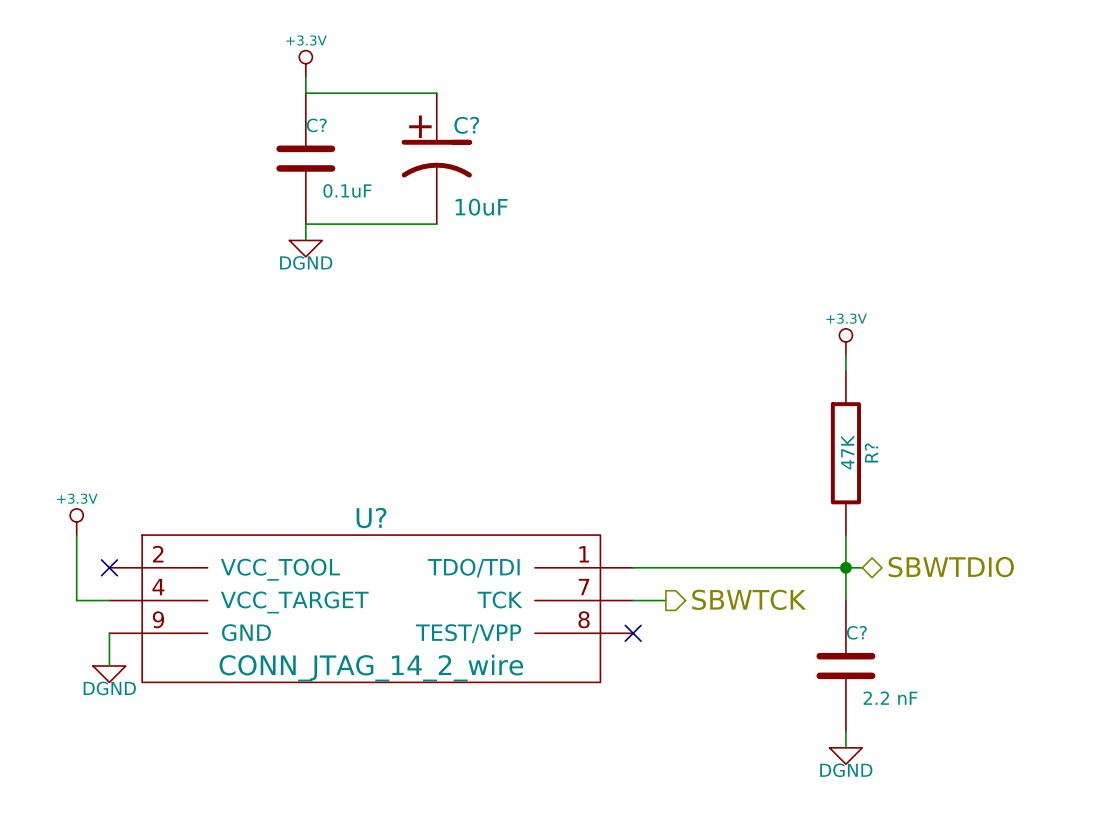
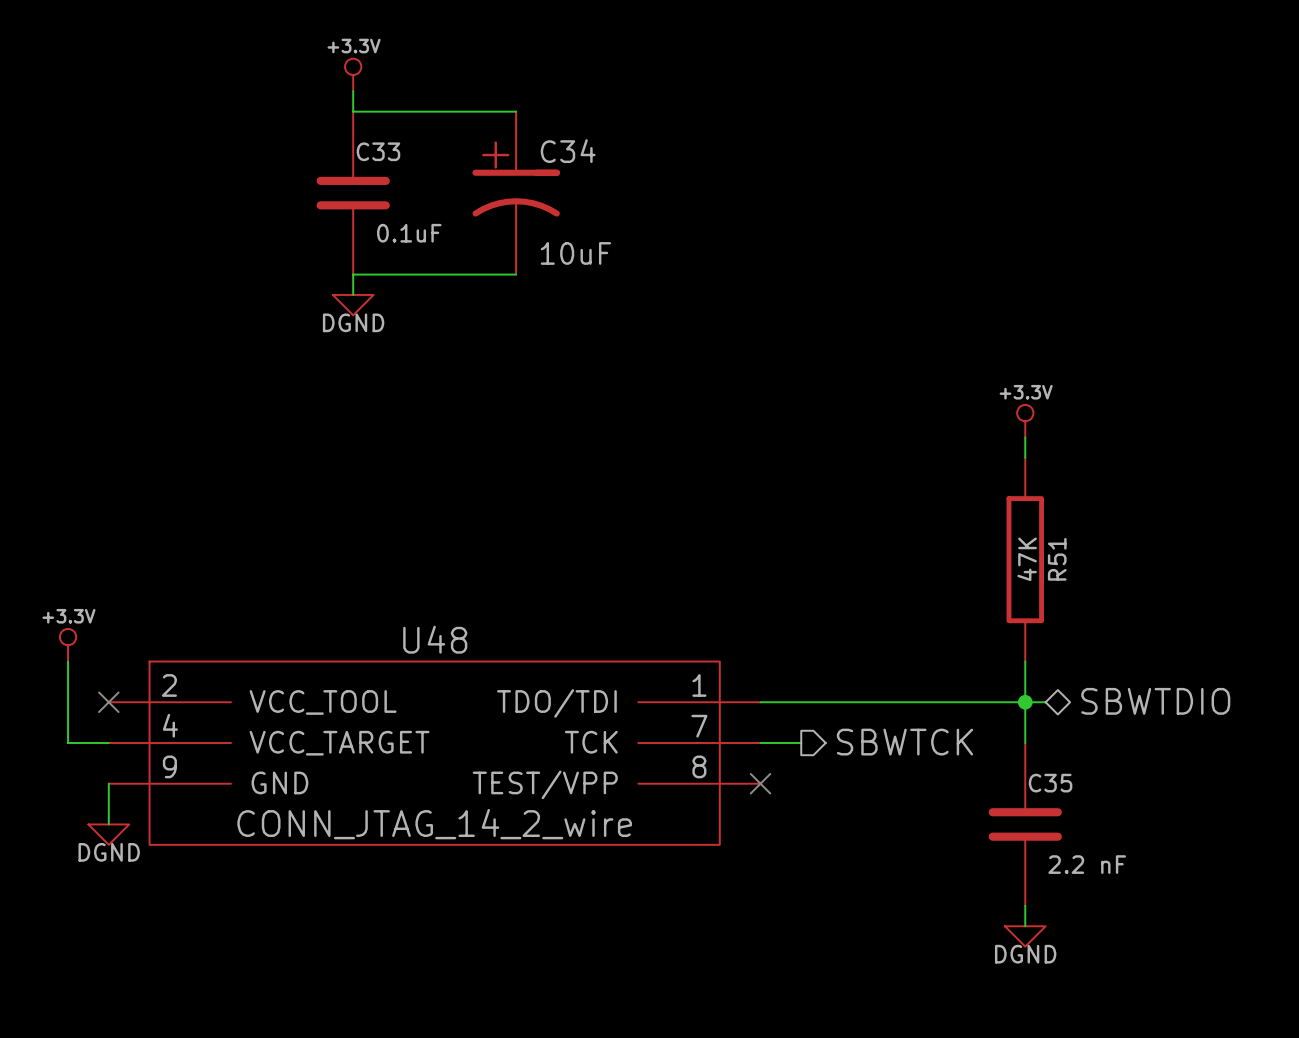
C? name: C? (316, 125) -> C33 (378, 151)
C? name: C? (466, 125) -> C34 (568, 151)
R? name: R? (871, 452) -> R51 (1057, 559)
U? name: U? (371, 517) -> U48 (435, 639)
C? name: C? (856, 632) -> C35 (1050, 783)

